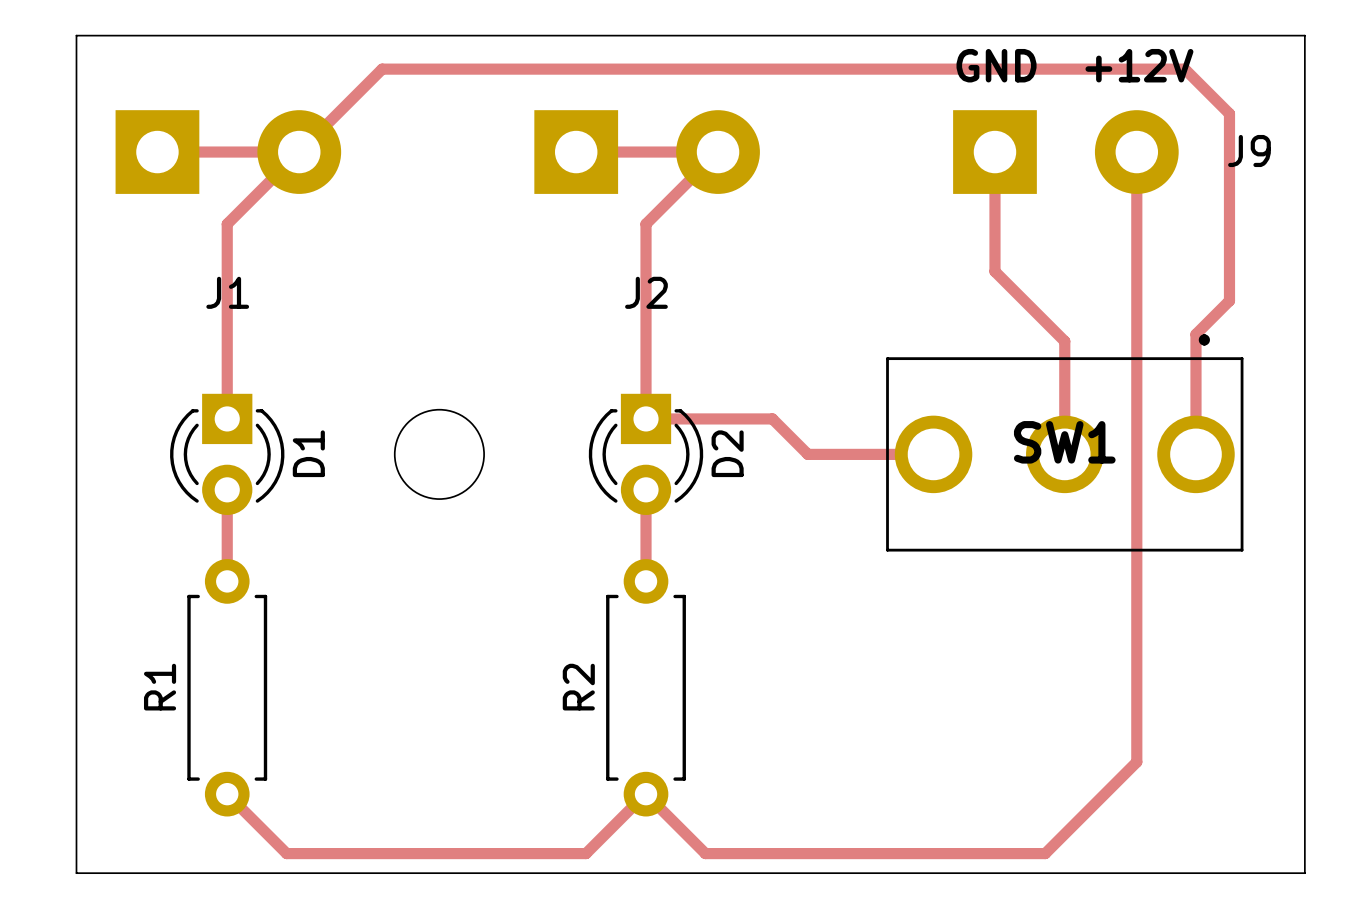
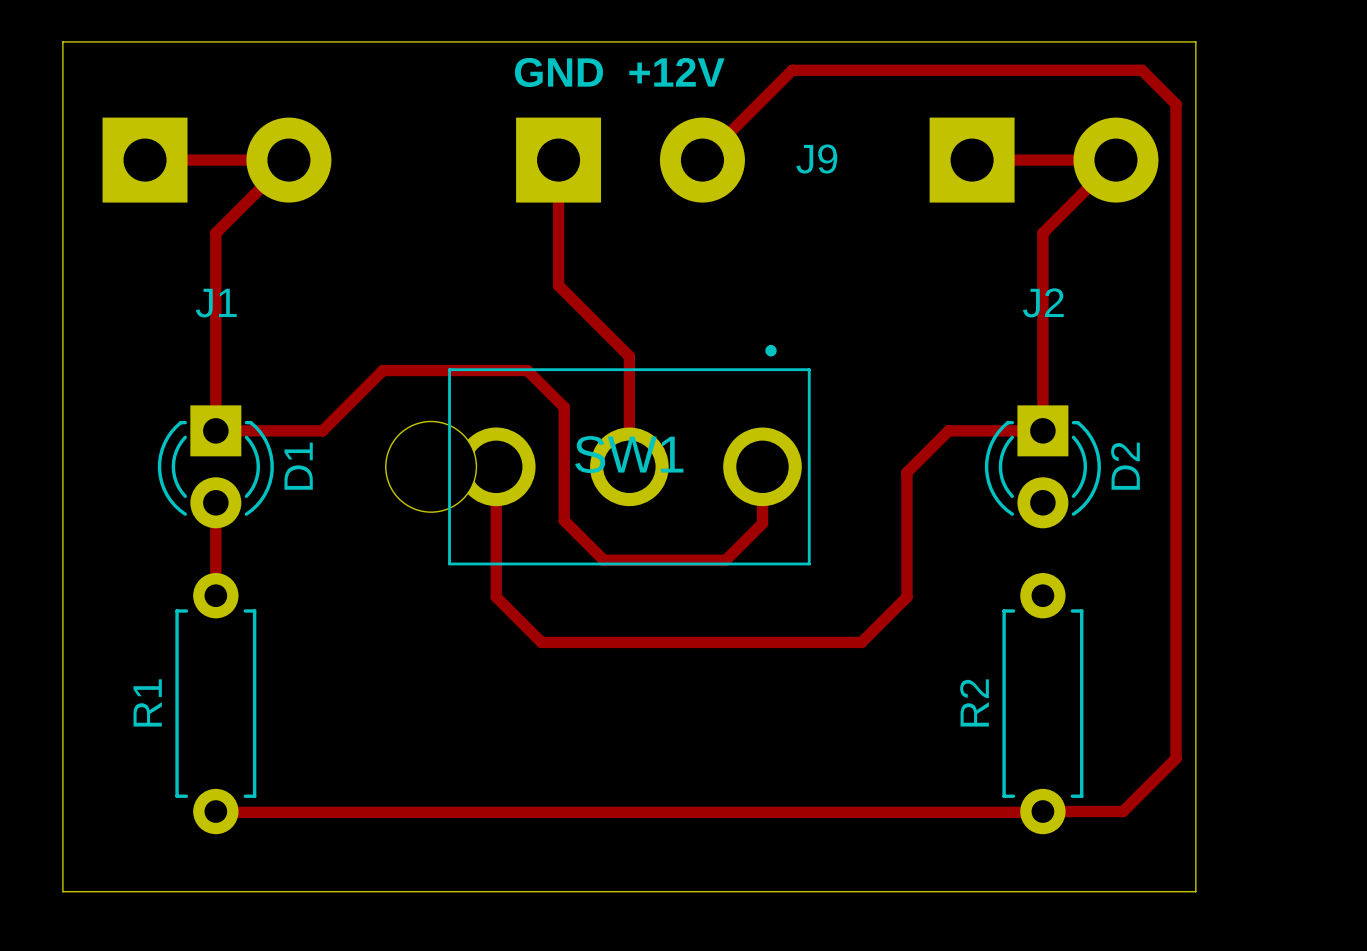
board edge: (1193, 35) (1304, 35) (1304, 873) (1193, 873) -> (1195, 41) (1195, 891)
text position: GND +12V (1074, 65) -> GND +12V (619, 72)
top track: (299, 152) (382, 69) (1184, 69) (1229, 113) (1229, 300) (1195, 334) (1195, 454) -> none
top track: none -> (558, 160) (558, 285) (629, 356) (629, 466)
top track: (576, 152) (718, 152) (646, 224) (646, 418) (772, 418) (807, 454) (933, 454) -> none
J2 position: (647, 152) -> (1044, 160)
top track: none -> (972, 160) (1115, 160) (1042, 233) (1042, 430) (948, 430) (906, 472) (906, 597) (861, 642) (541, 642) (496, 597) (496, 466)
top track: (994, 152) (994, 271) (1064, 341) (1064, 454) -> none
J9 position: (1065, 152) -> (630, 160)
top track: (1136, 152) (1136, 762) (1045, 853) (705, 853) (646, 794) (586, 853) (286, 853) (228, 794) -> (702, 160) (792, 70) (1142, 70) (1176, 104) (1176, 758) (1123, 811) (216, 812)
top track: none -> (215, 430) (322, 430) (382, 370) (527, 370) (564, 407) (564, 520) (603, 560) (725, 560) (762, 523) (762, 466)
SW1 position: (1064, 442) -> (629, 455)
D2 position: (646, 454) -> (1042, 466)
top track: (646, 489) (646, 581) -> none
R2 position: (646, 687) -> (1042, 703)

